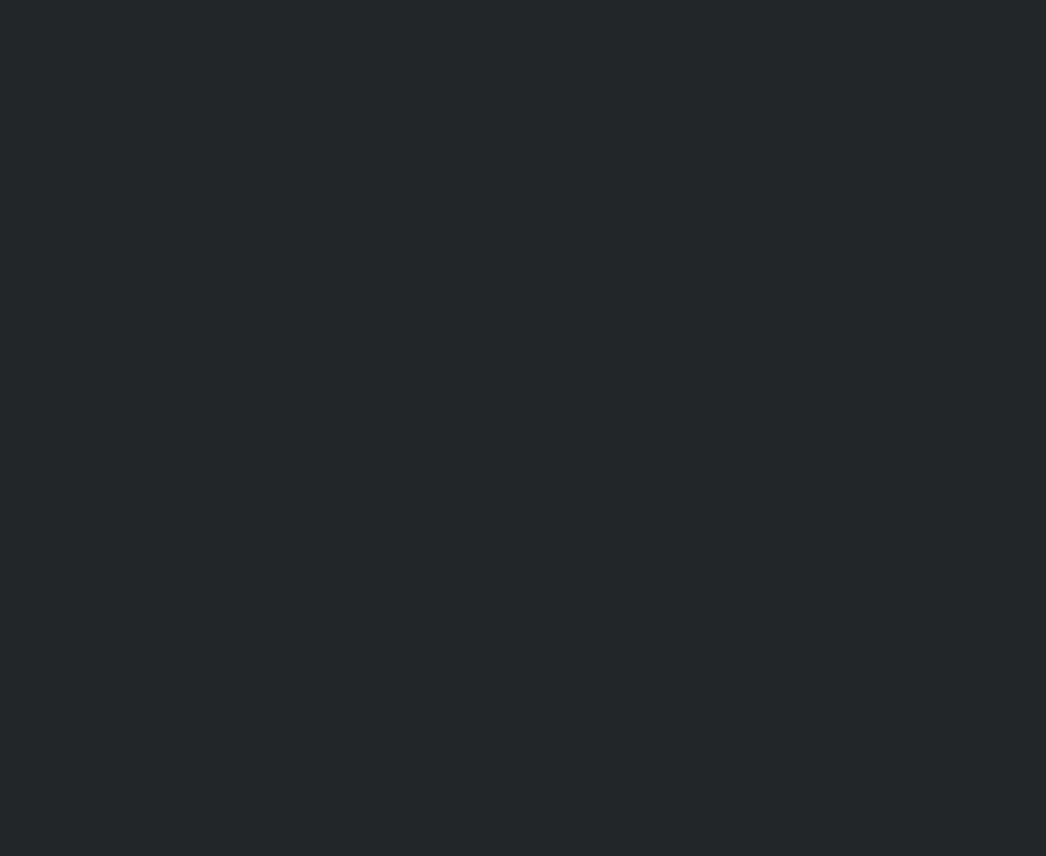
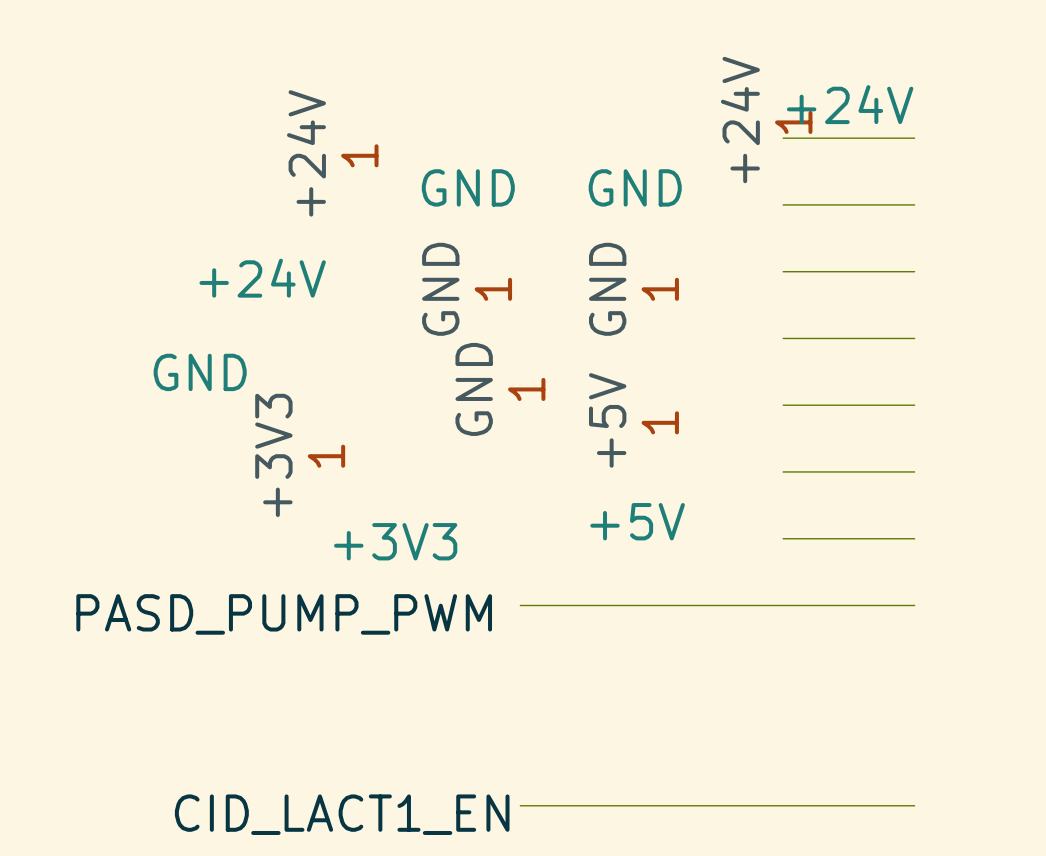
power symbol: none -> +24V (817, 120)
wire: none -> (783, 138) (914, 138)
power symbol: none -> +24V (288, 193)
wire: none -> (783, 204) (914, 204)
power symbol: none -> GND (468, 252)
power symbol: none -> GND (635, 252)
wire: none -> (783, 271) (914, 271)
wire: none -> (783, 338) (914, 338)
power symbol: none -> GND (349, 389)
wire: none -> (783, 405) (914, 405)
power symbol: none -> +5V (636, 456)
wire: none -> (783, 471) (914, 471)
power symbol: none -> +3V3 (356, 477)
wire: none -> (783, 538) (914, 538)
wire: none -> (520, 605) (914, 605)
label: none -> PASD_PUMP_PWM (284, 614)
wire: none -> (520, 805) (914, 805)
label: none -> CID_LACT1_EN (342, 814)

